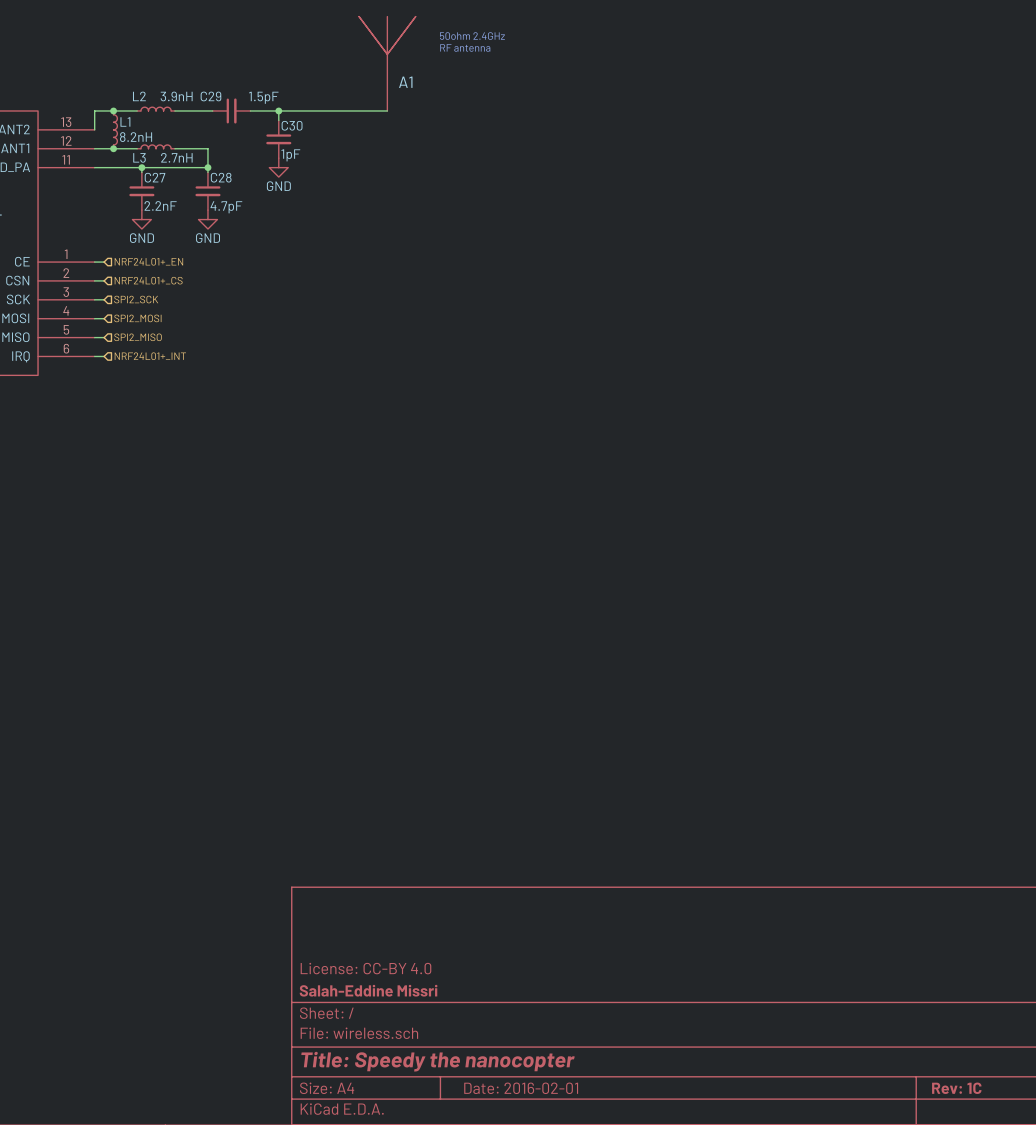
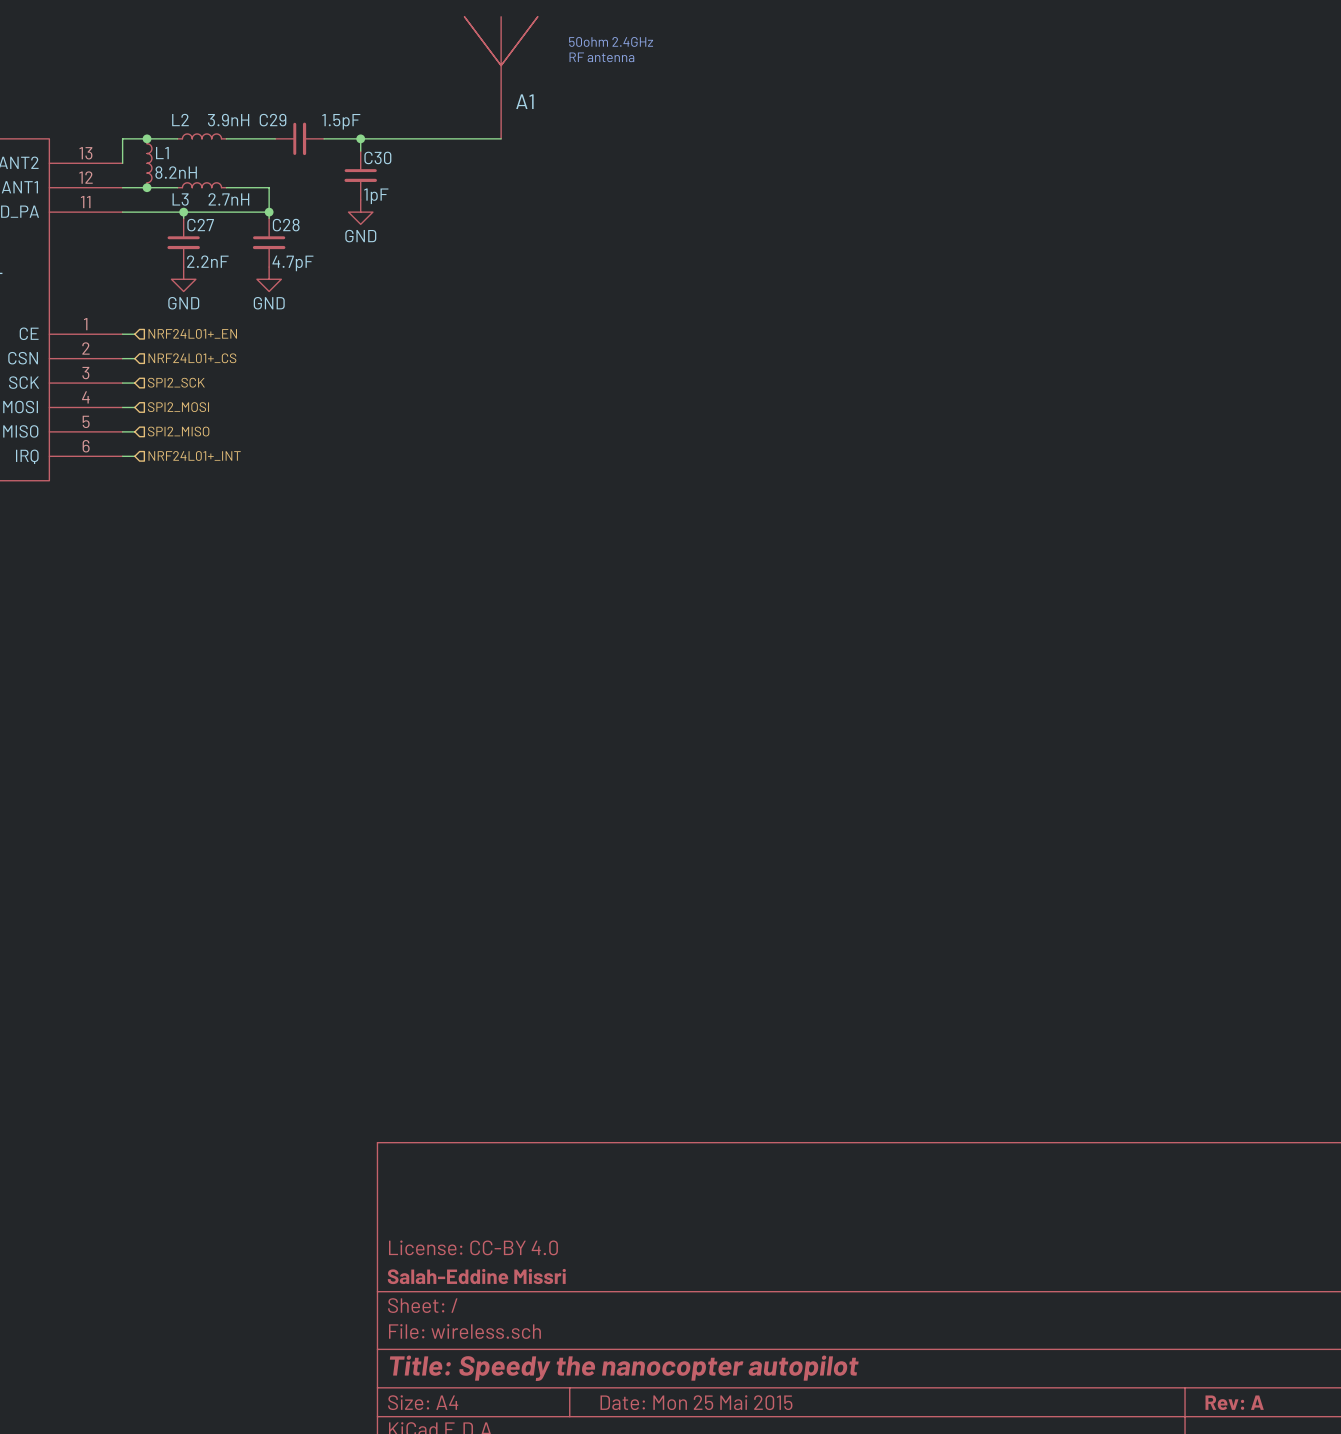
title block: Title: Speedy the nanocopter (438, 1061) -> Title: Speedy the nanocopter autopilot (624, 1368)
title block: Date: 2016-02-01 (521, 1088) -> Date: Mon 25 Mai 2015 (696, 1402)
title block: Rev: 1C (956, 1088) -> Rev: A (1234, 1402)

